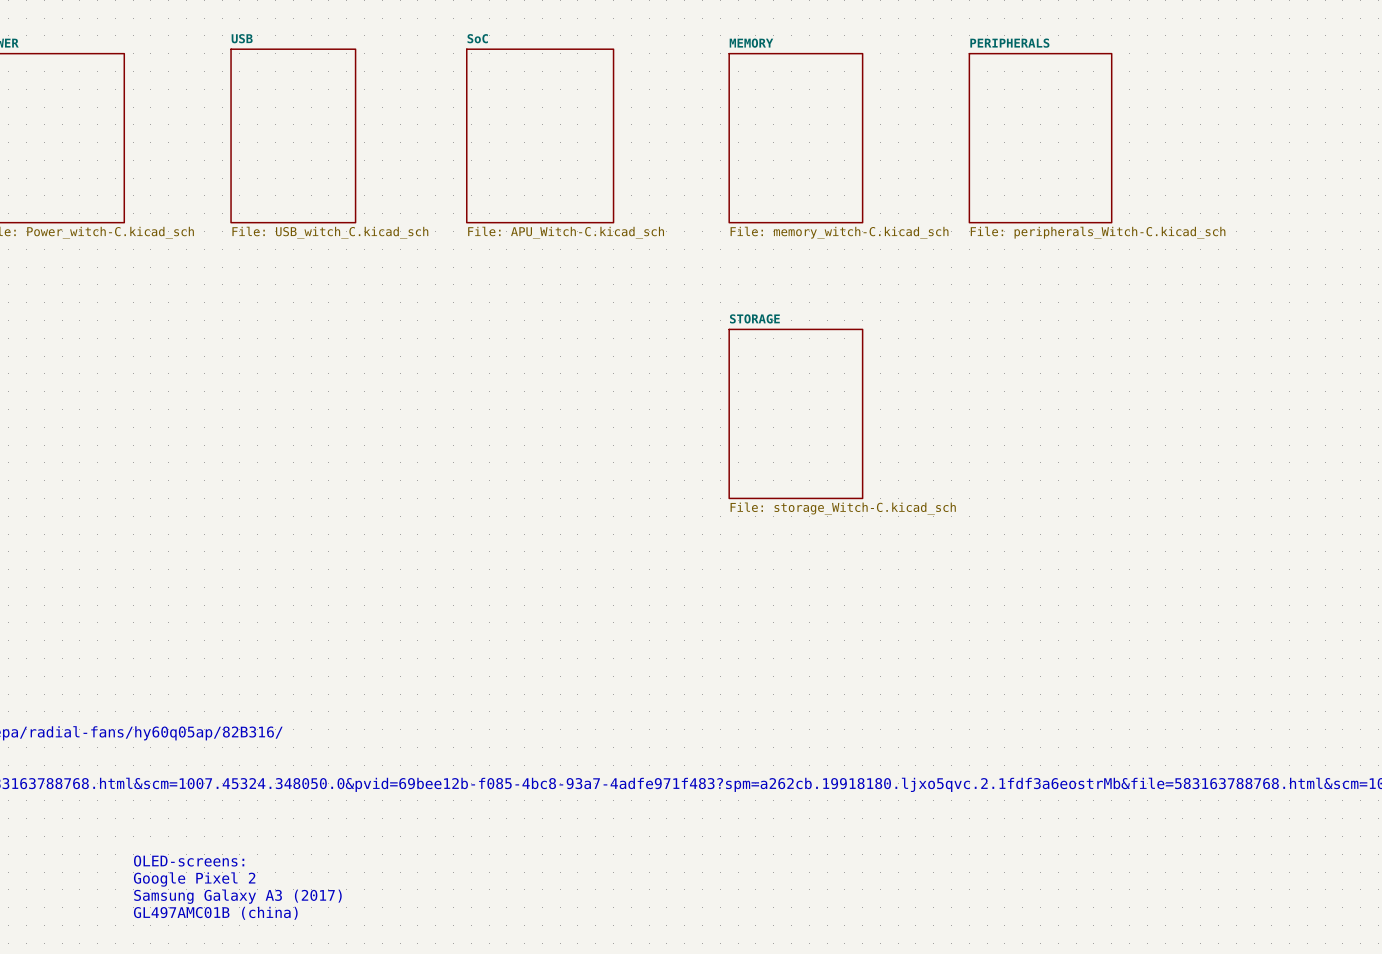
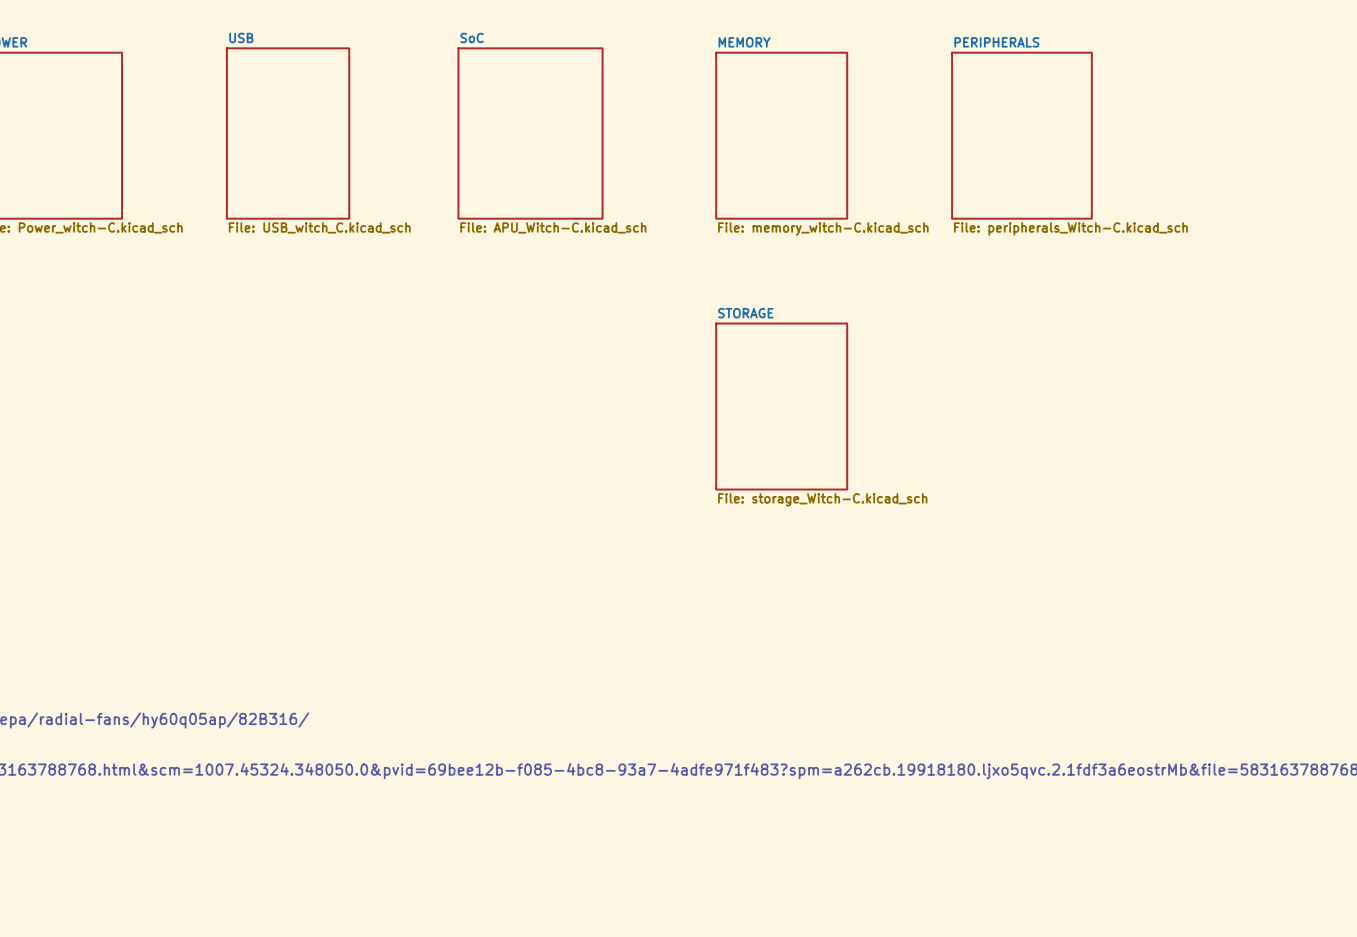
text: OLED-screens: (189, 861) -> none
text: Google Pixel 2 (194, 879) -> none
text: Samsung Galaxy A3 (2017) (237, 896) -> none
text: GL497AMC01B (china) (215, 913) -> none

